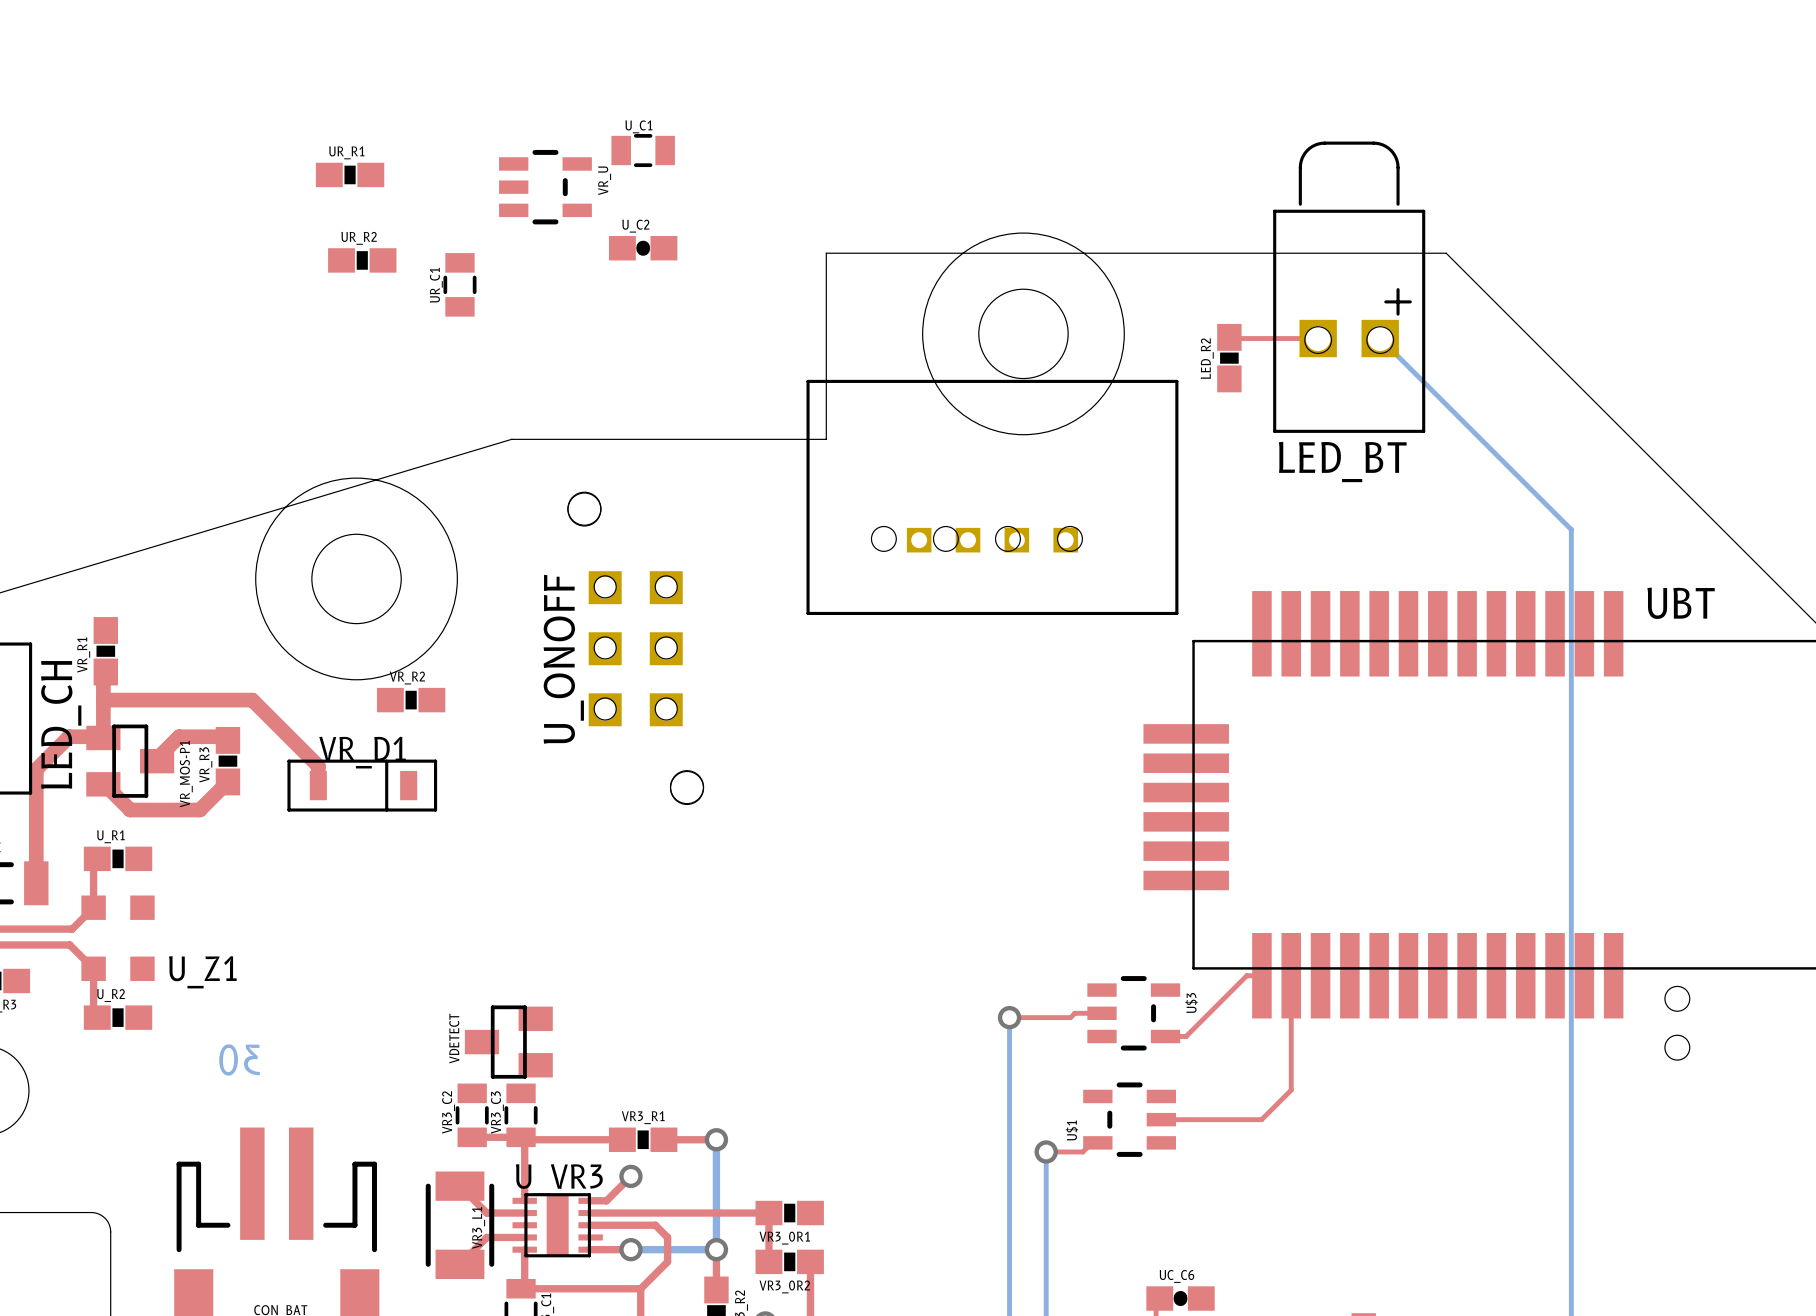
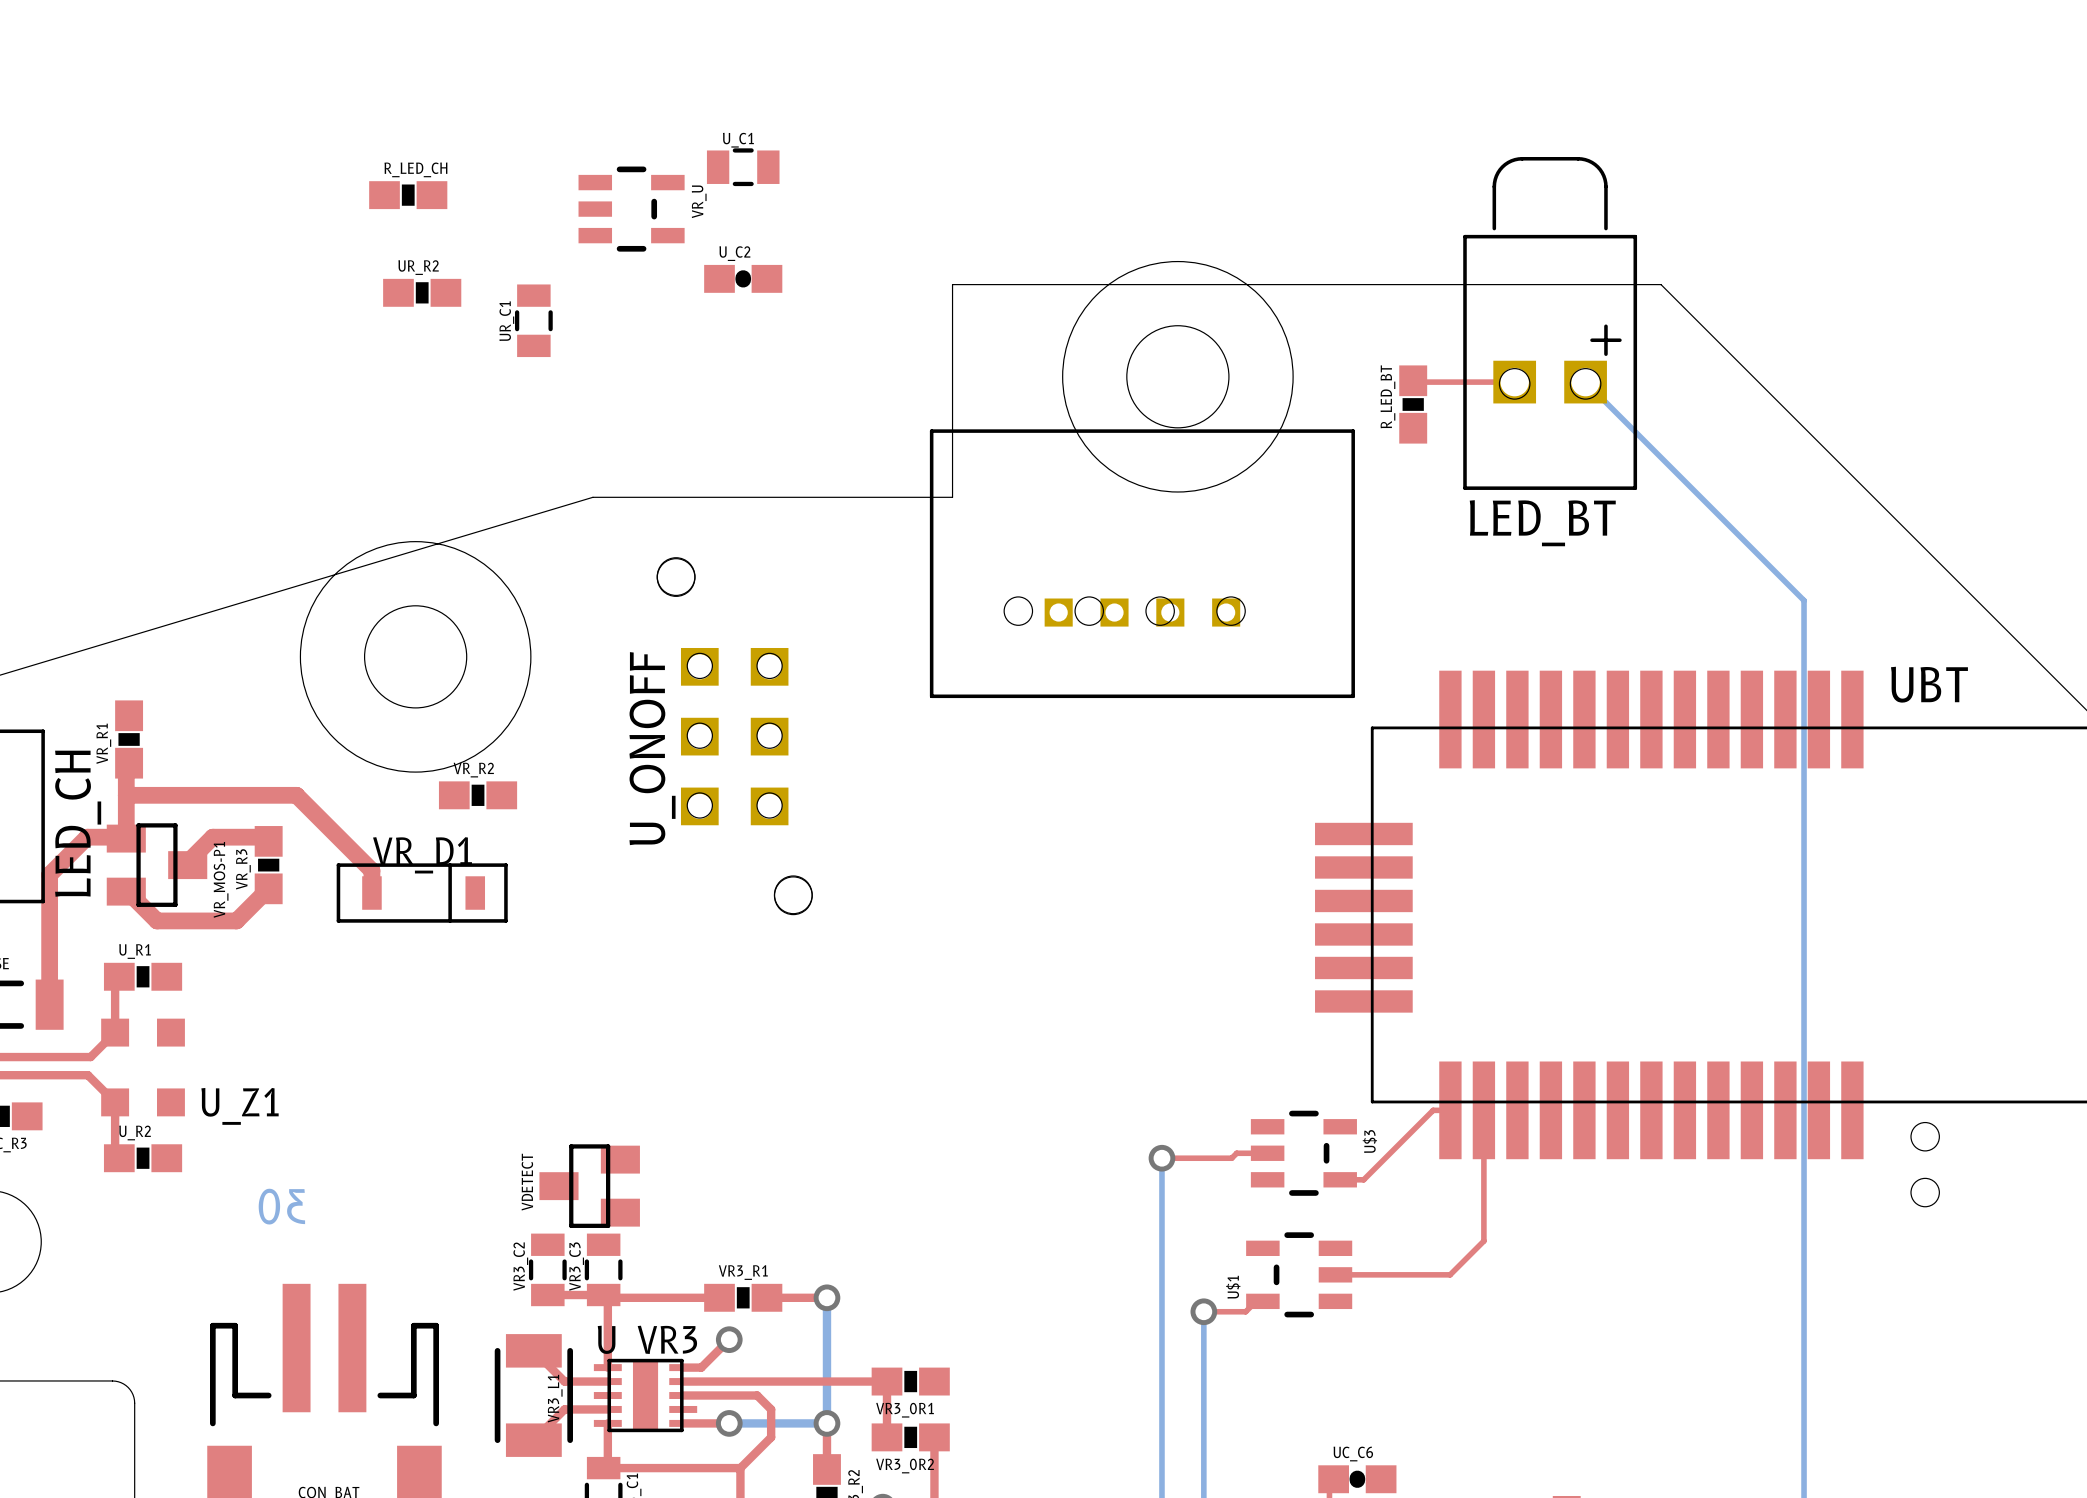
UR_R1 name: UR_R1 (346, 152) -> R_LED_CH (415, 169)
LED_R2 name: LED_R2 (1207, 358) -> R_LED_BT (1387, 396)

